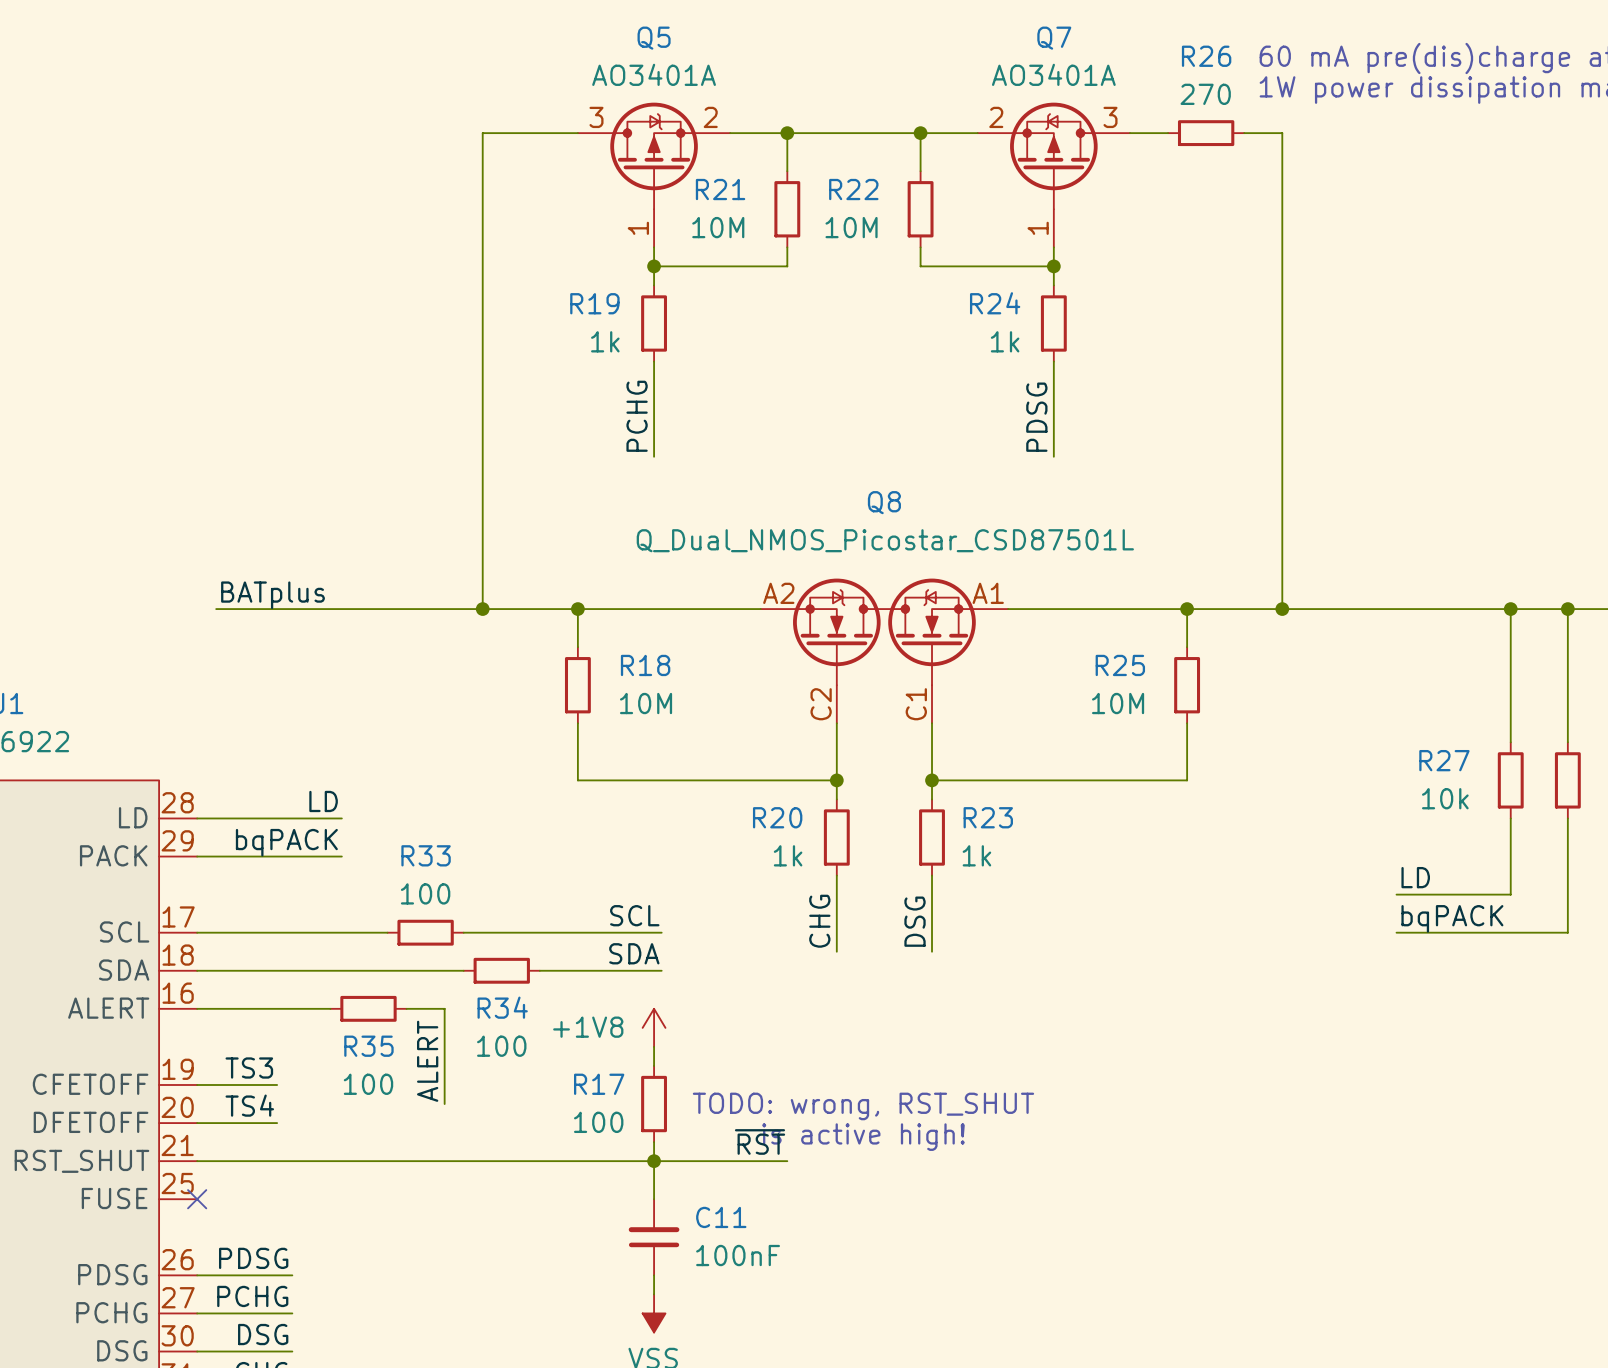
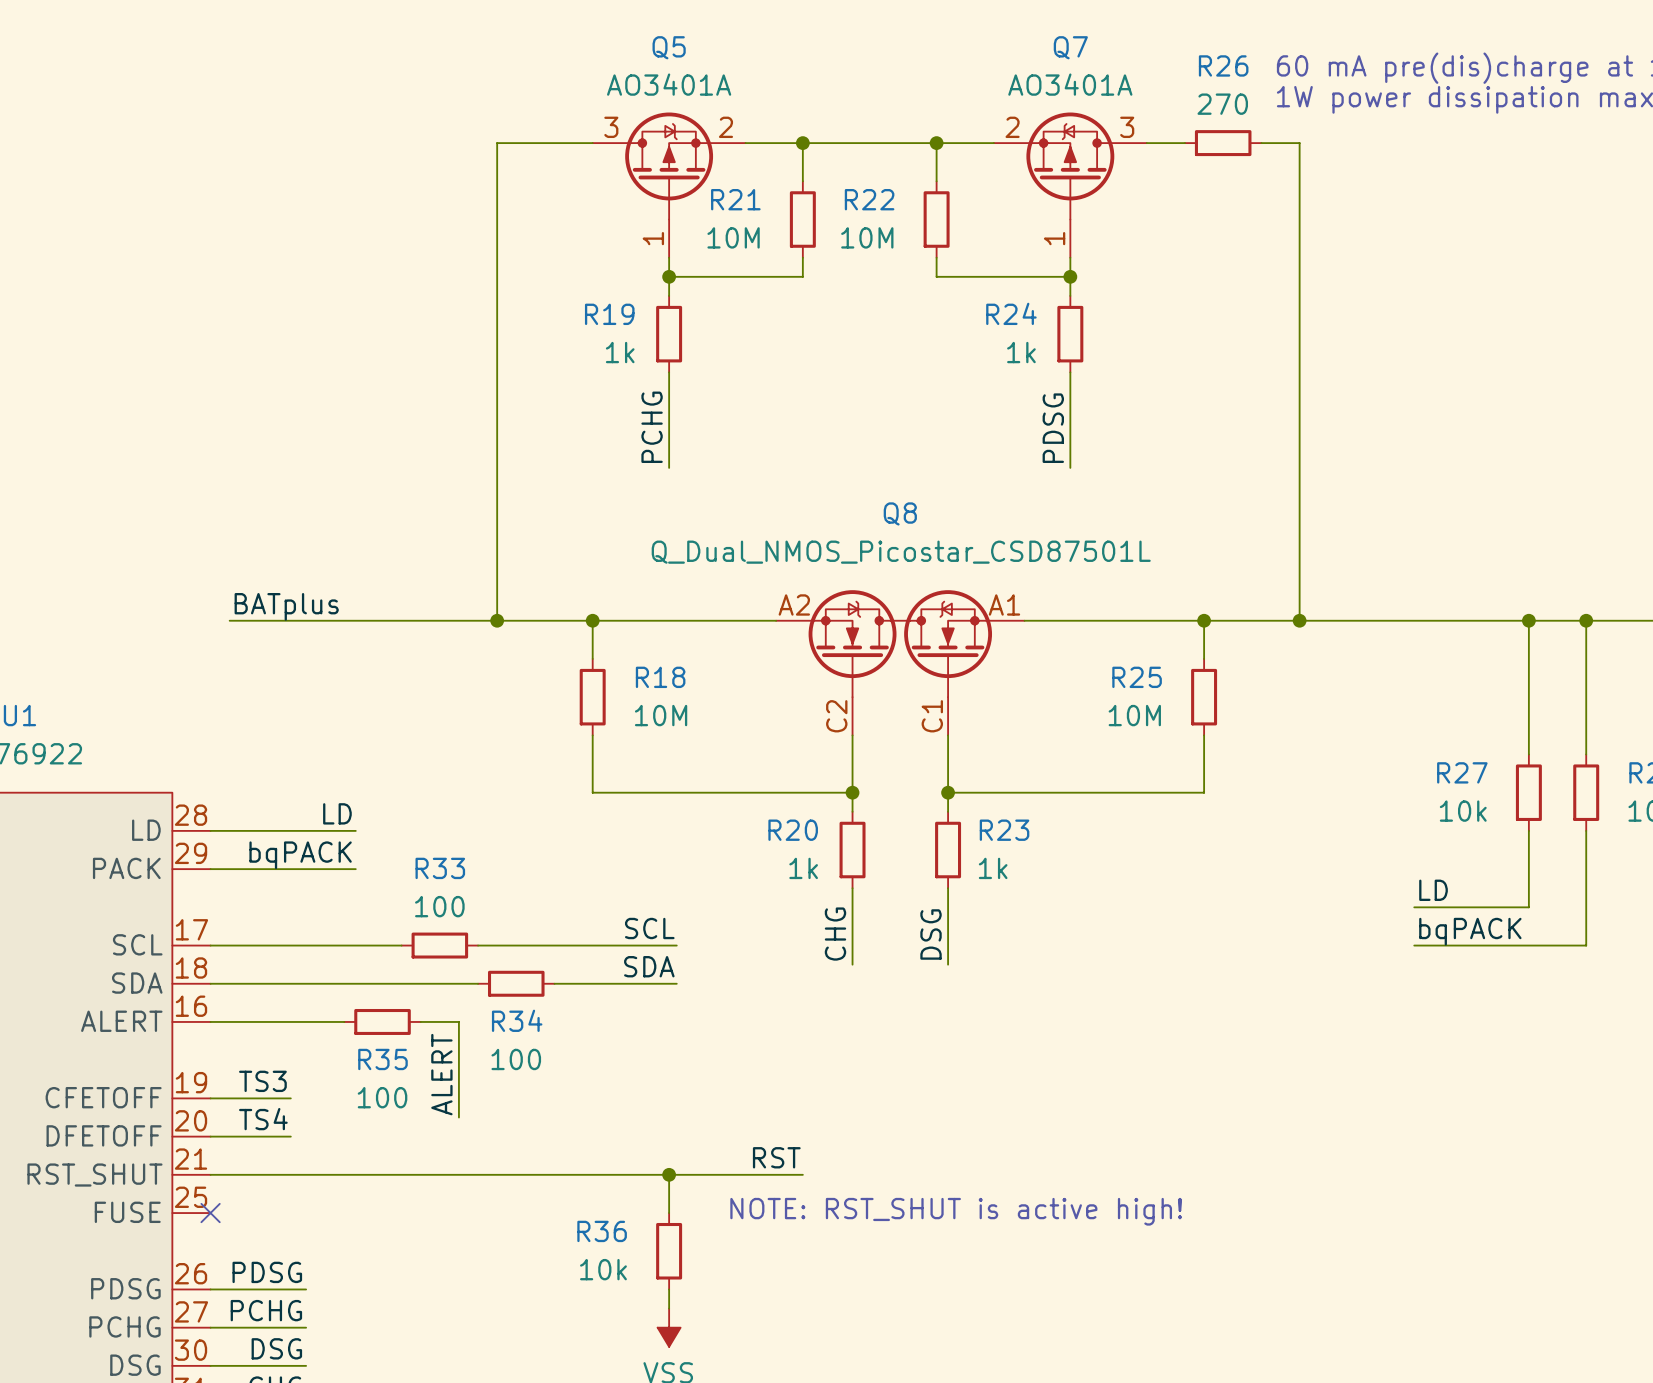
power symbol: +1V8 (654, 1027) -> none
wire: (654, 1046) (654, 1065) -> none
R17: 100 (654, 1104) -> none
text: TODO: wrong, RST_SHUT (863, 1106) -> none
text: is active high! (863, 1137) -> none
label: ~{RST} (760, 1141) -> RST (776, 1157)
wire: (654, 1142) (654, 1161) -> none
text: none -> NOTE: RST_SHUT is active high! (956, 1211)
C11: 100nF (654, 1237) -> none
R36: none -> 10k (669, 1251)

